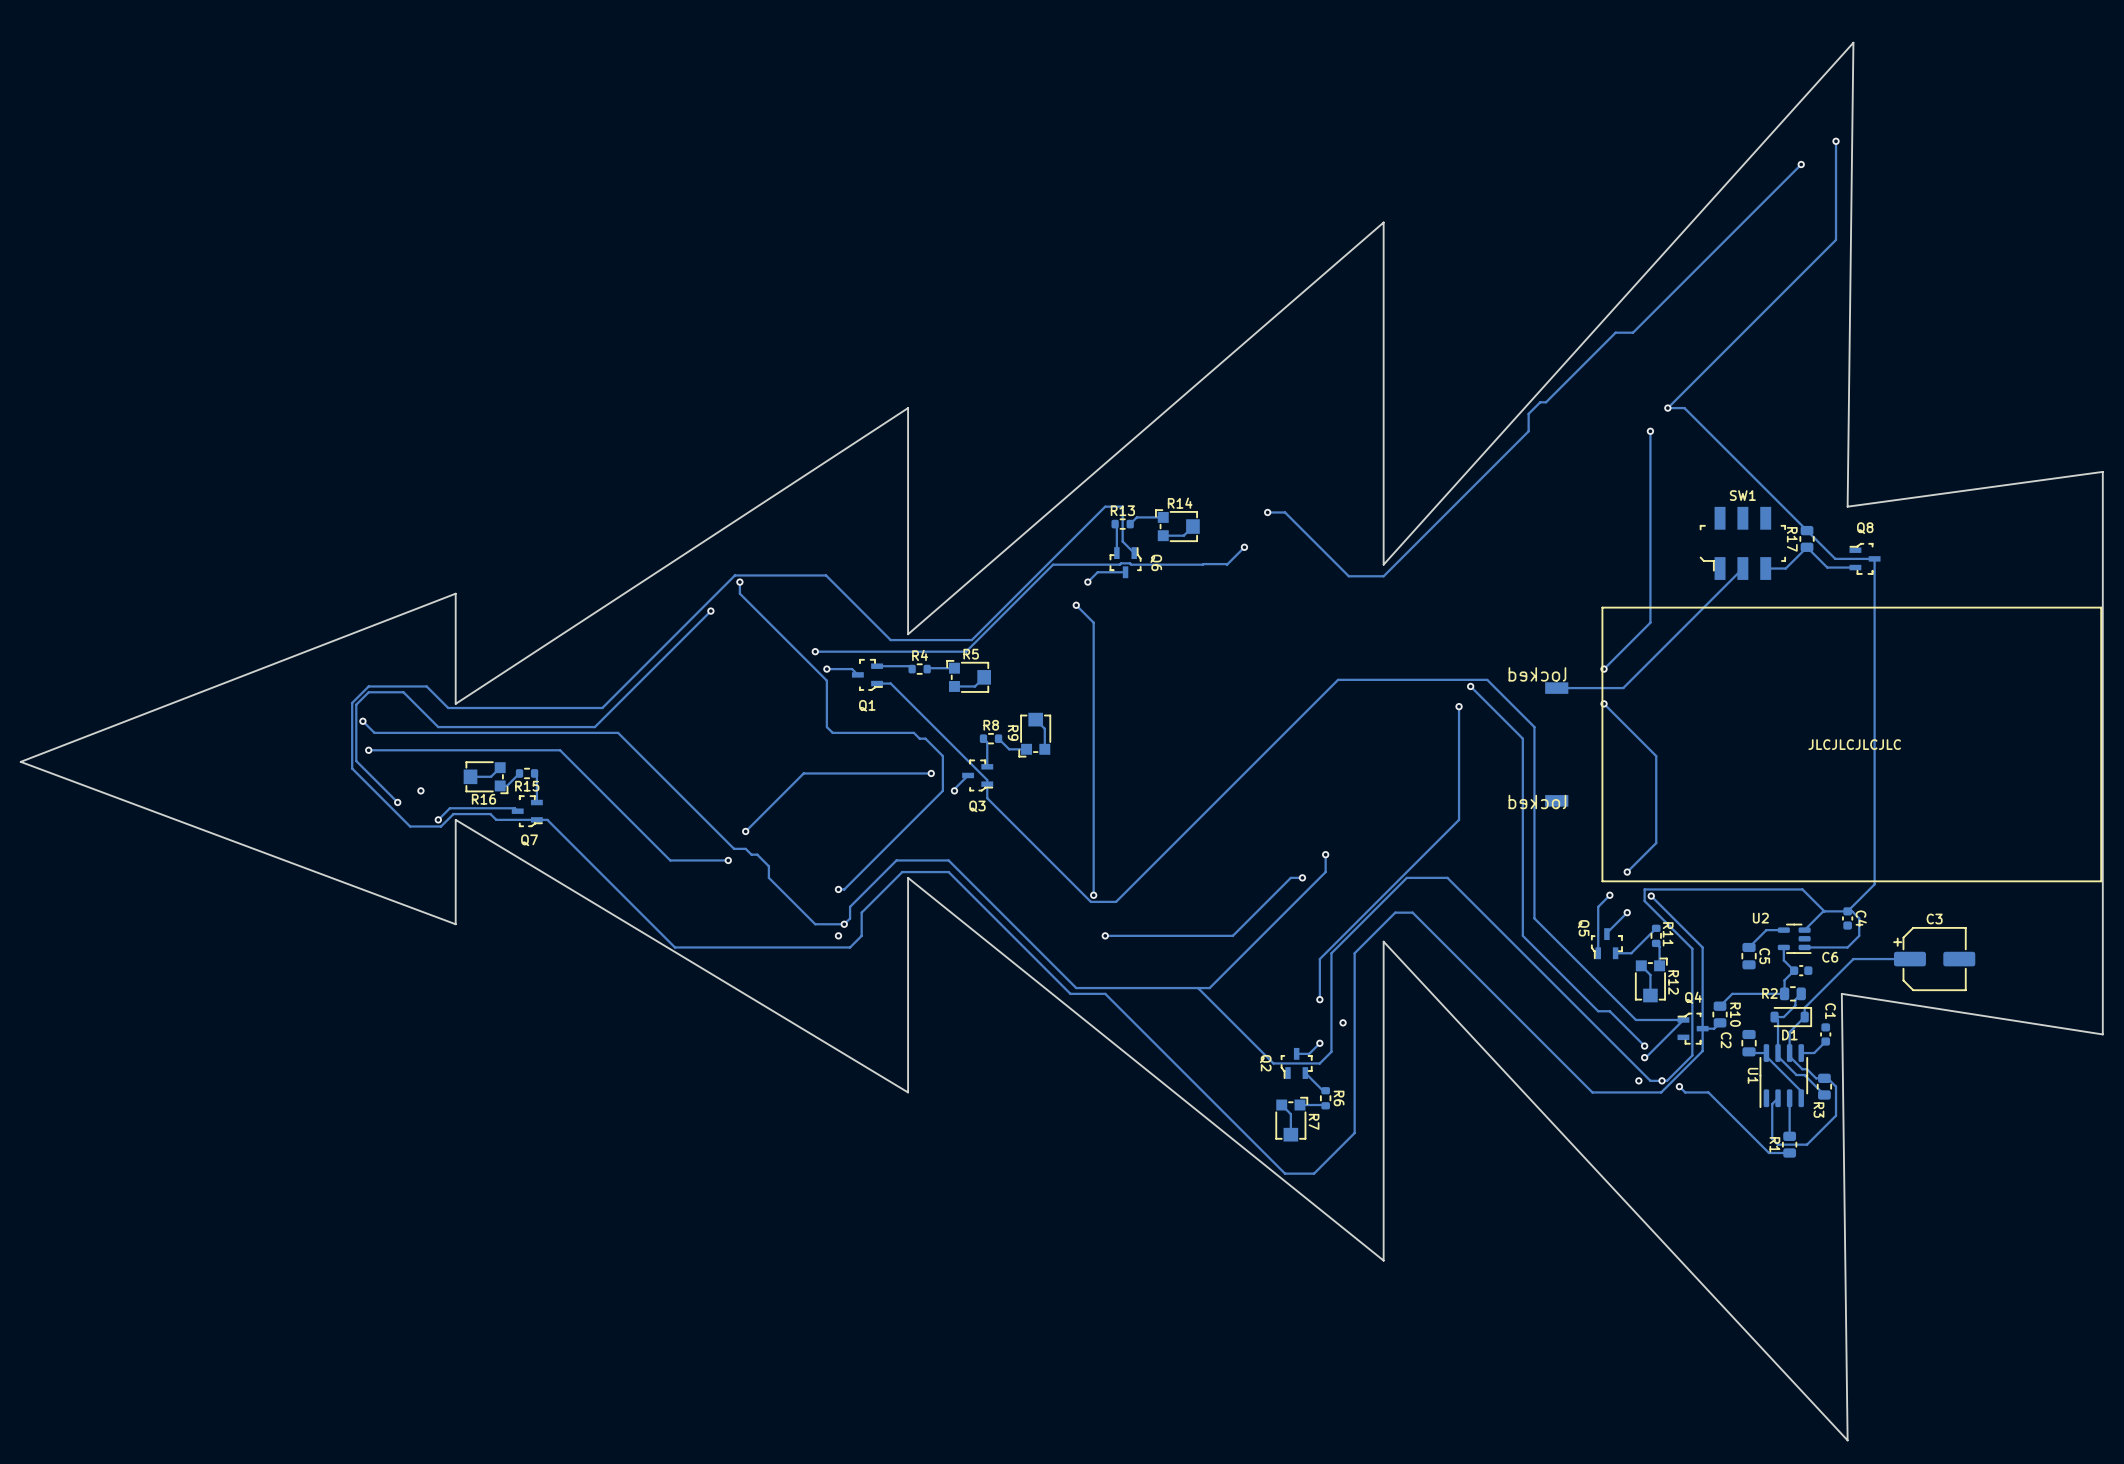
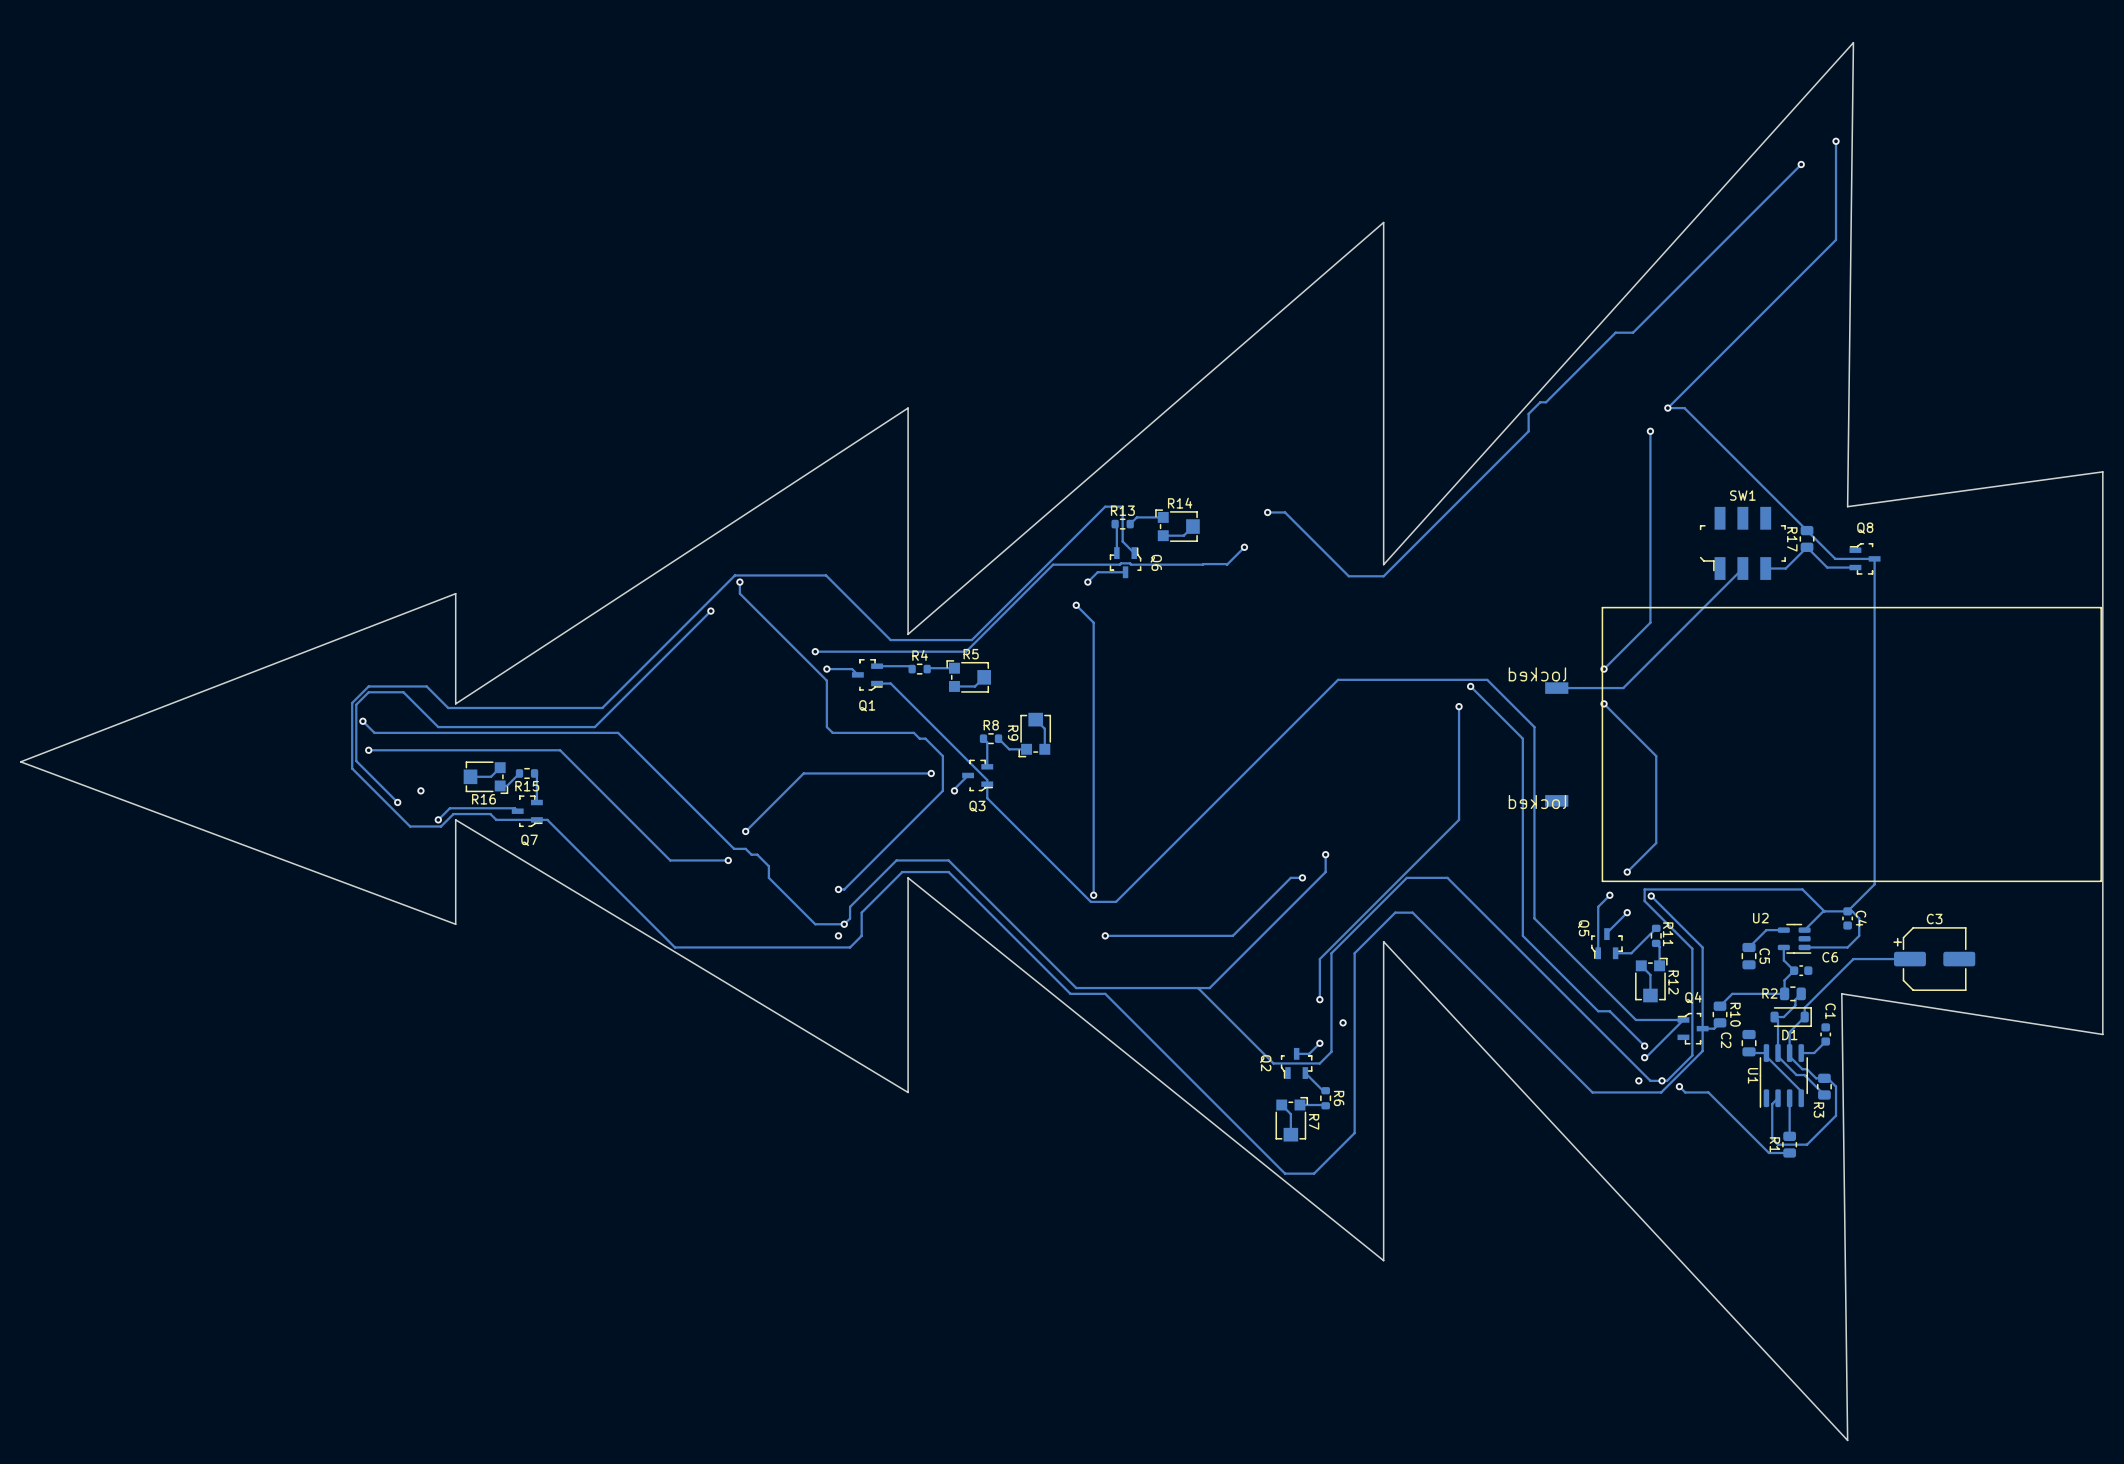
text: JLCJLCJLCJLC (1854, 744) -> none

